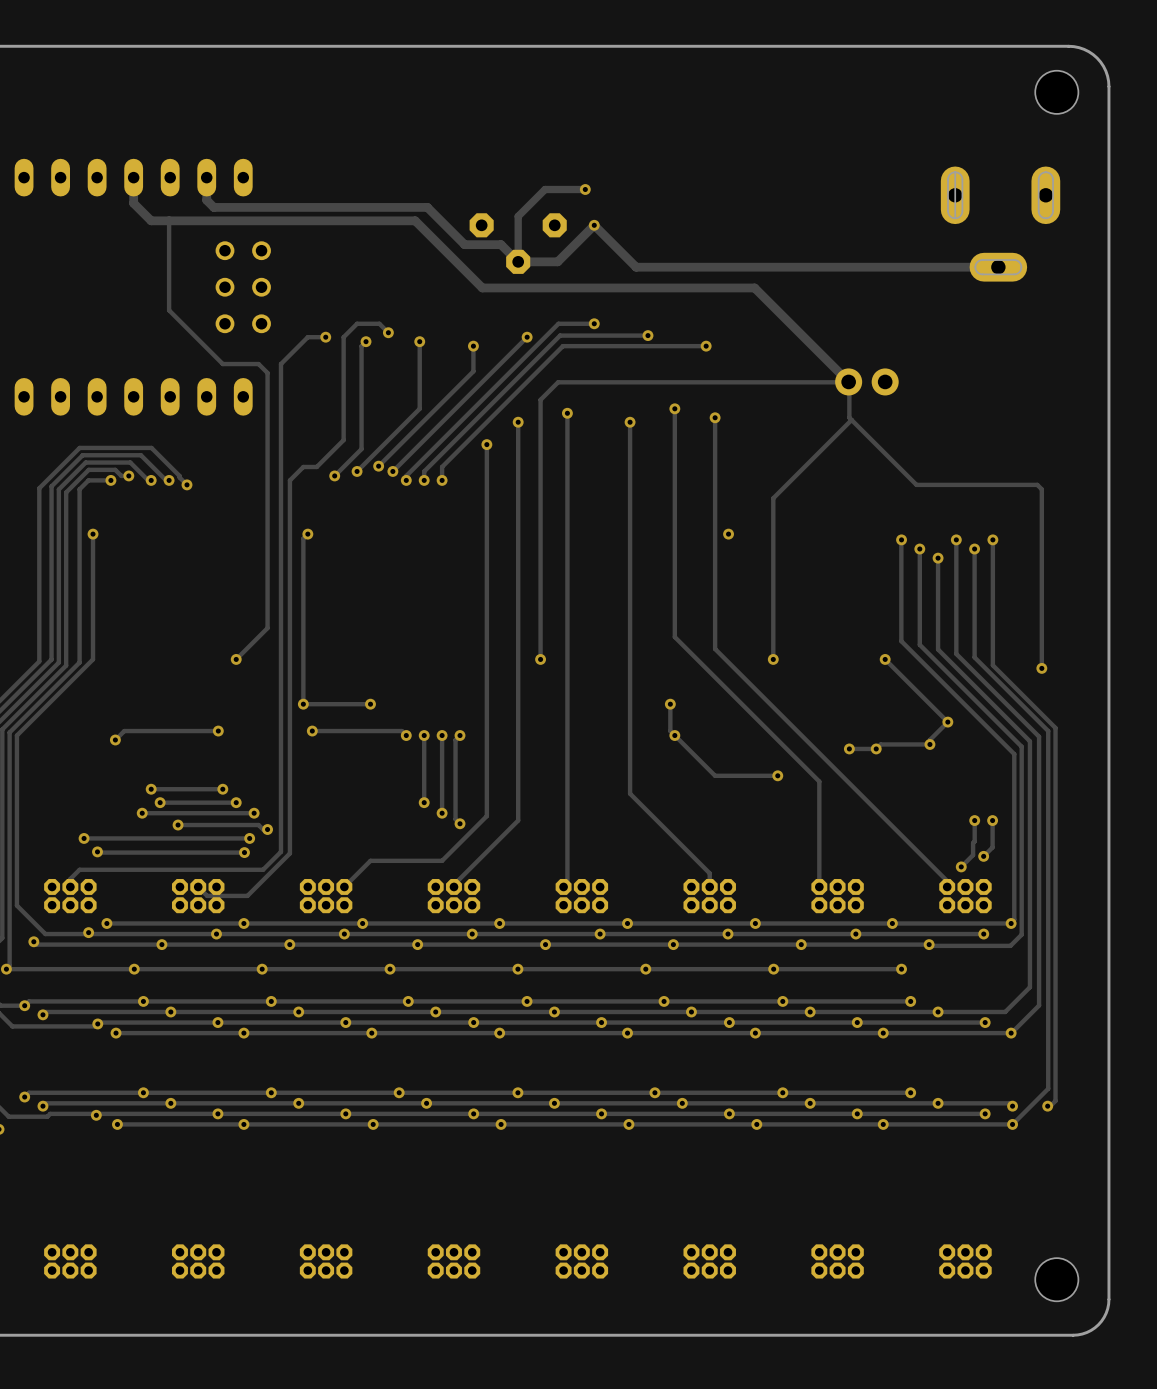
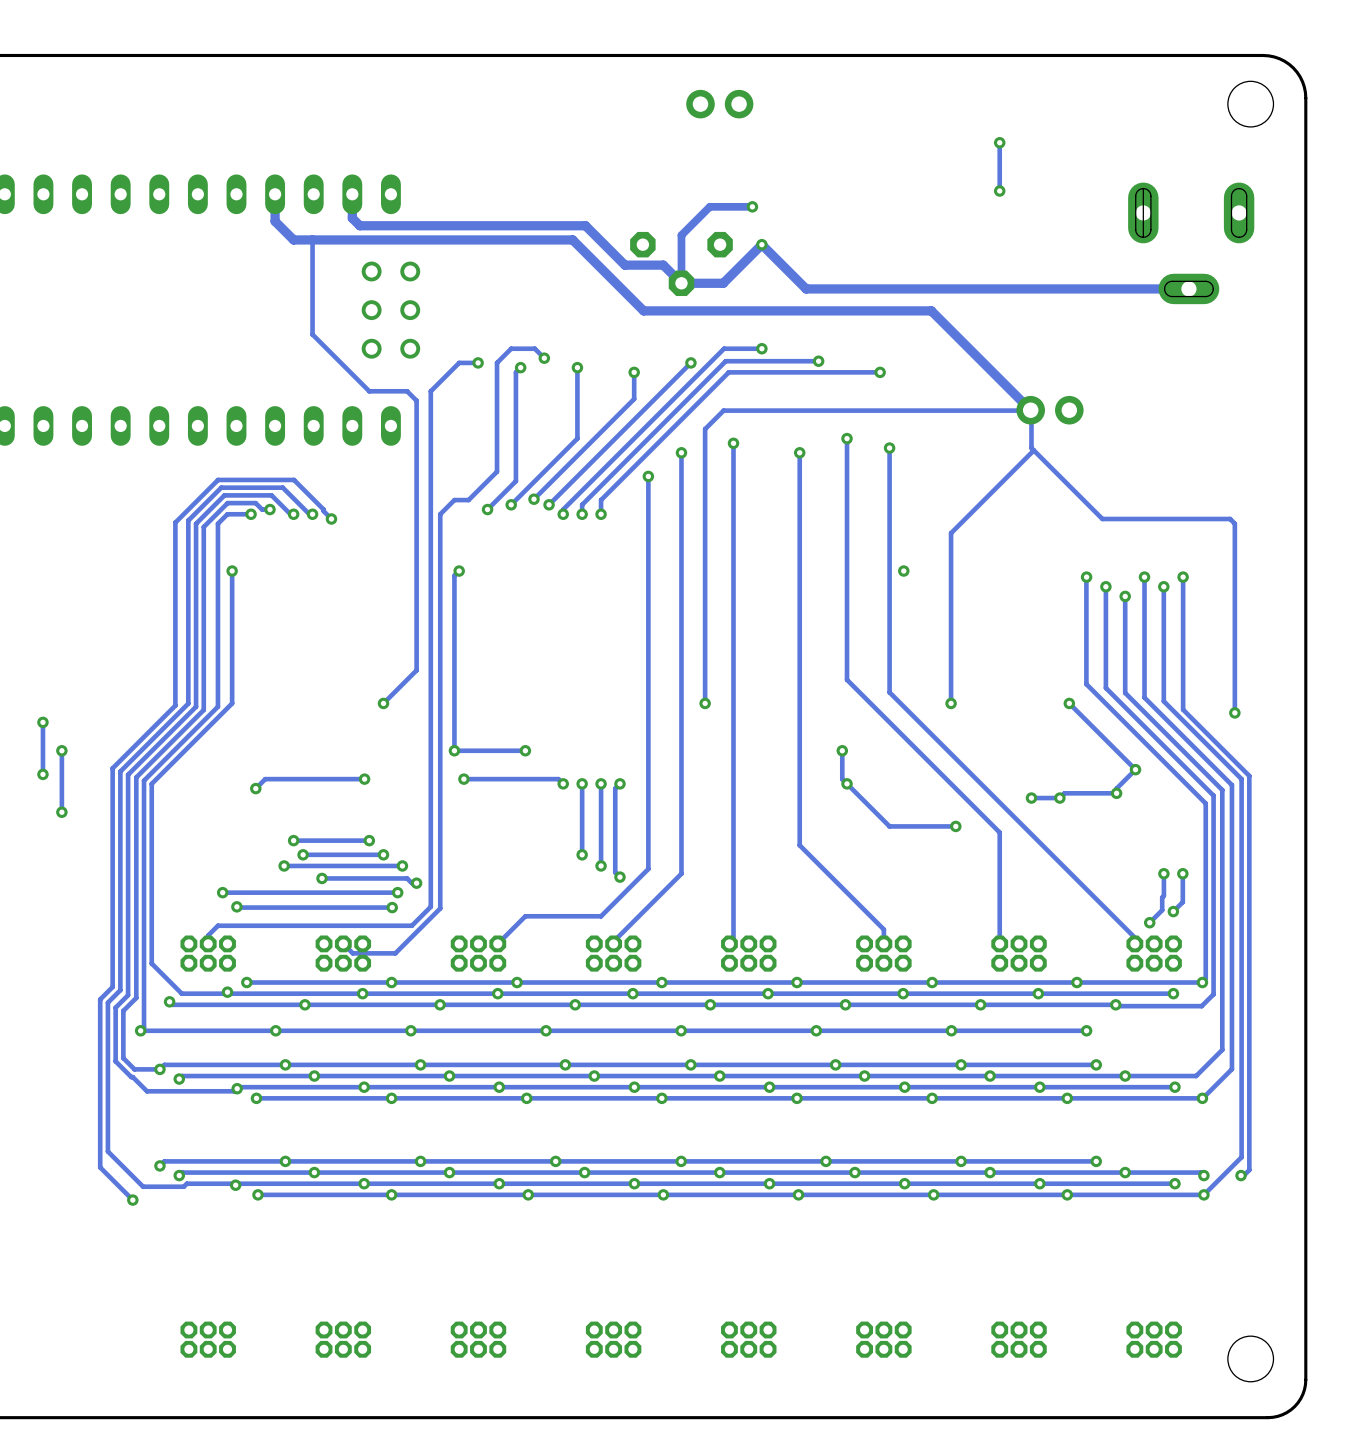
part: none -> (719, 104)
track: none -> (999, 142) (999, 191)
via: none -> (999, 142)
via: none -> (999, 191)

